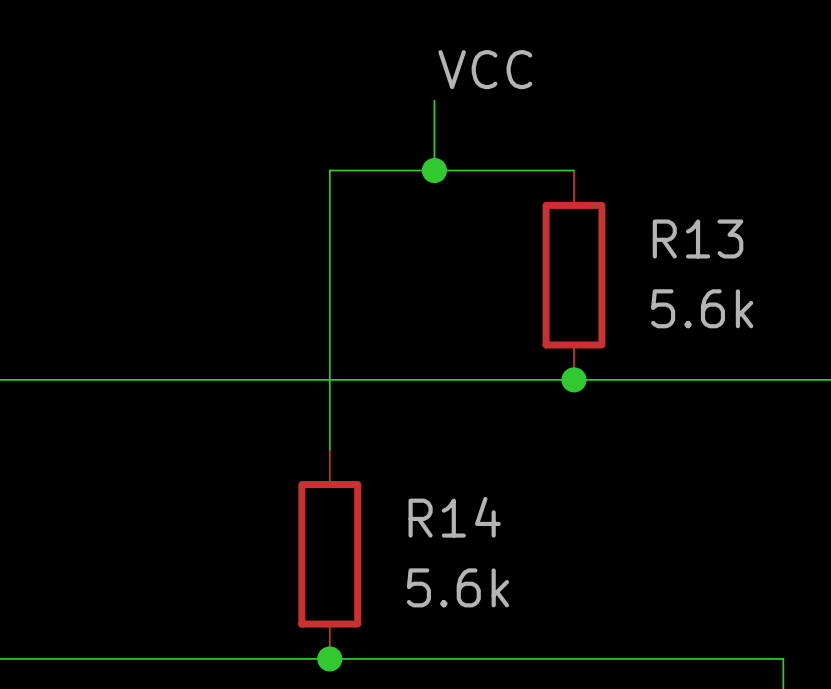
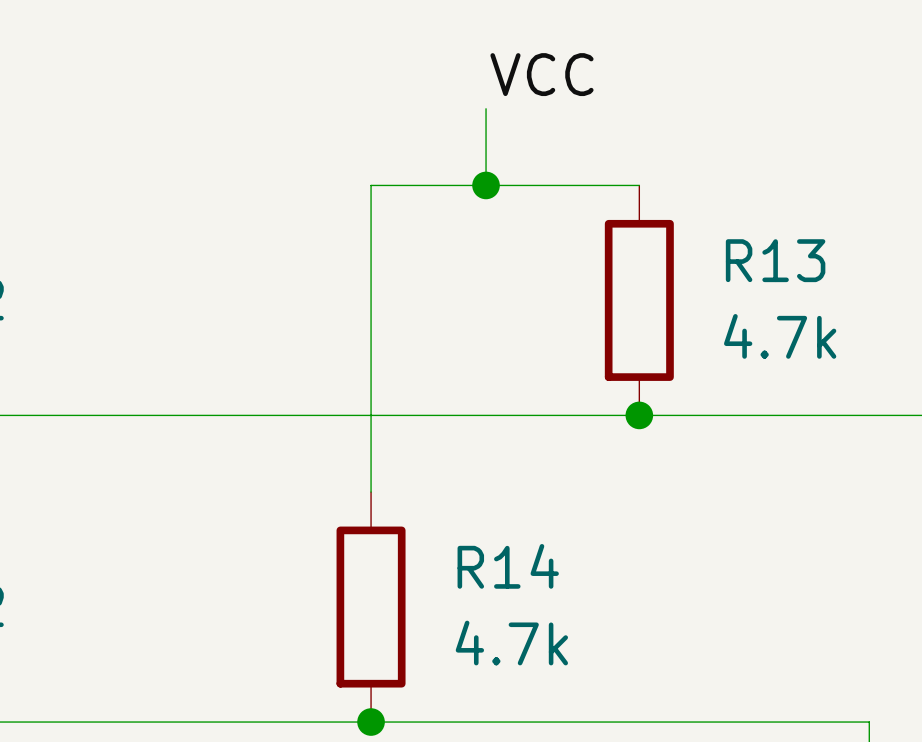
R13 value: 5.6k (702, 308) -> 4.7k (780, 336)
R14 value: 5.6k (457, 587) -> 4.7k (511, 643)

